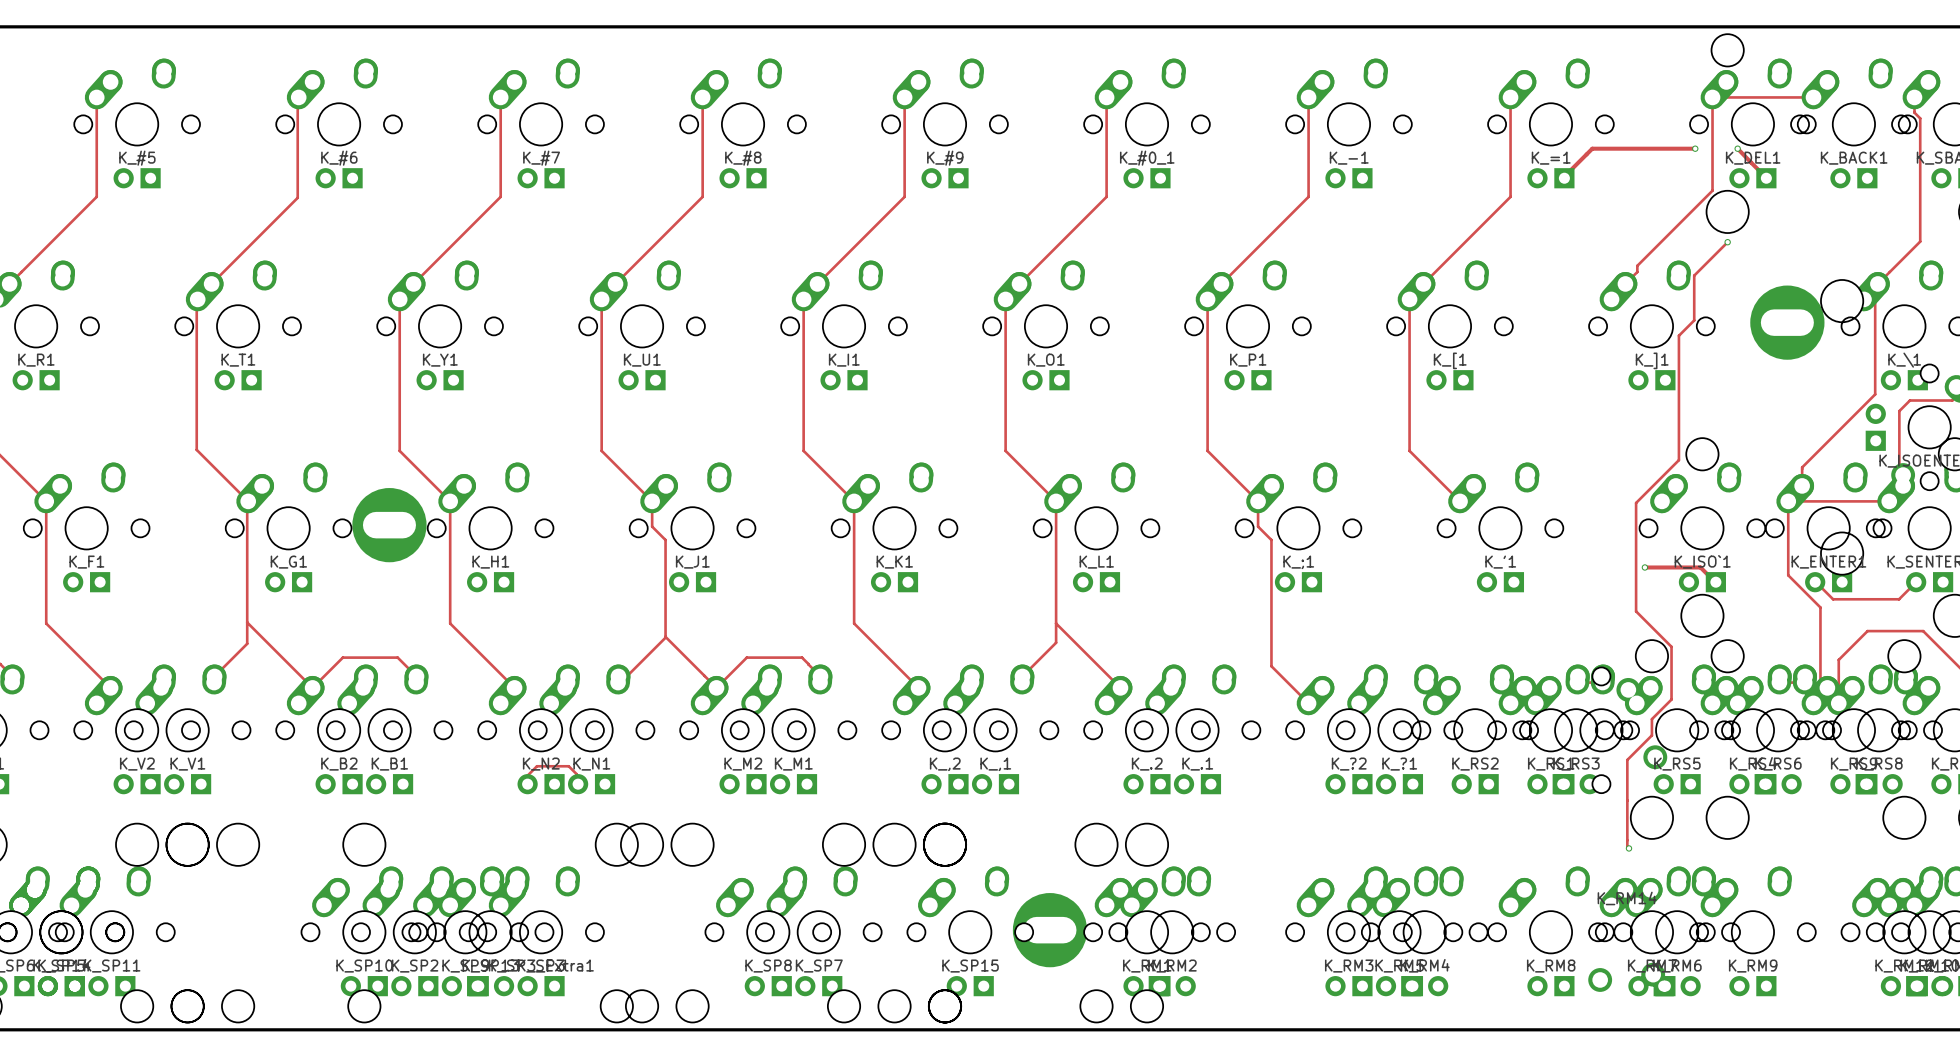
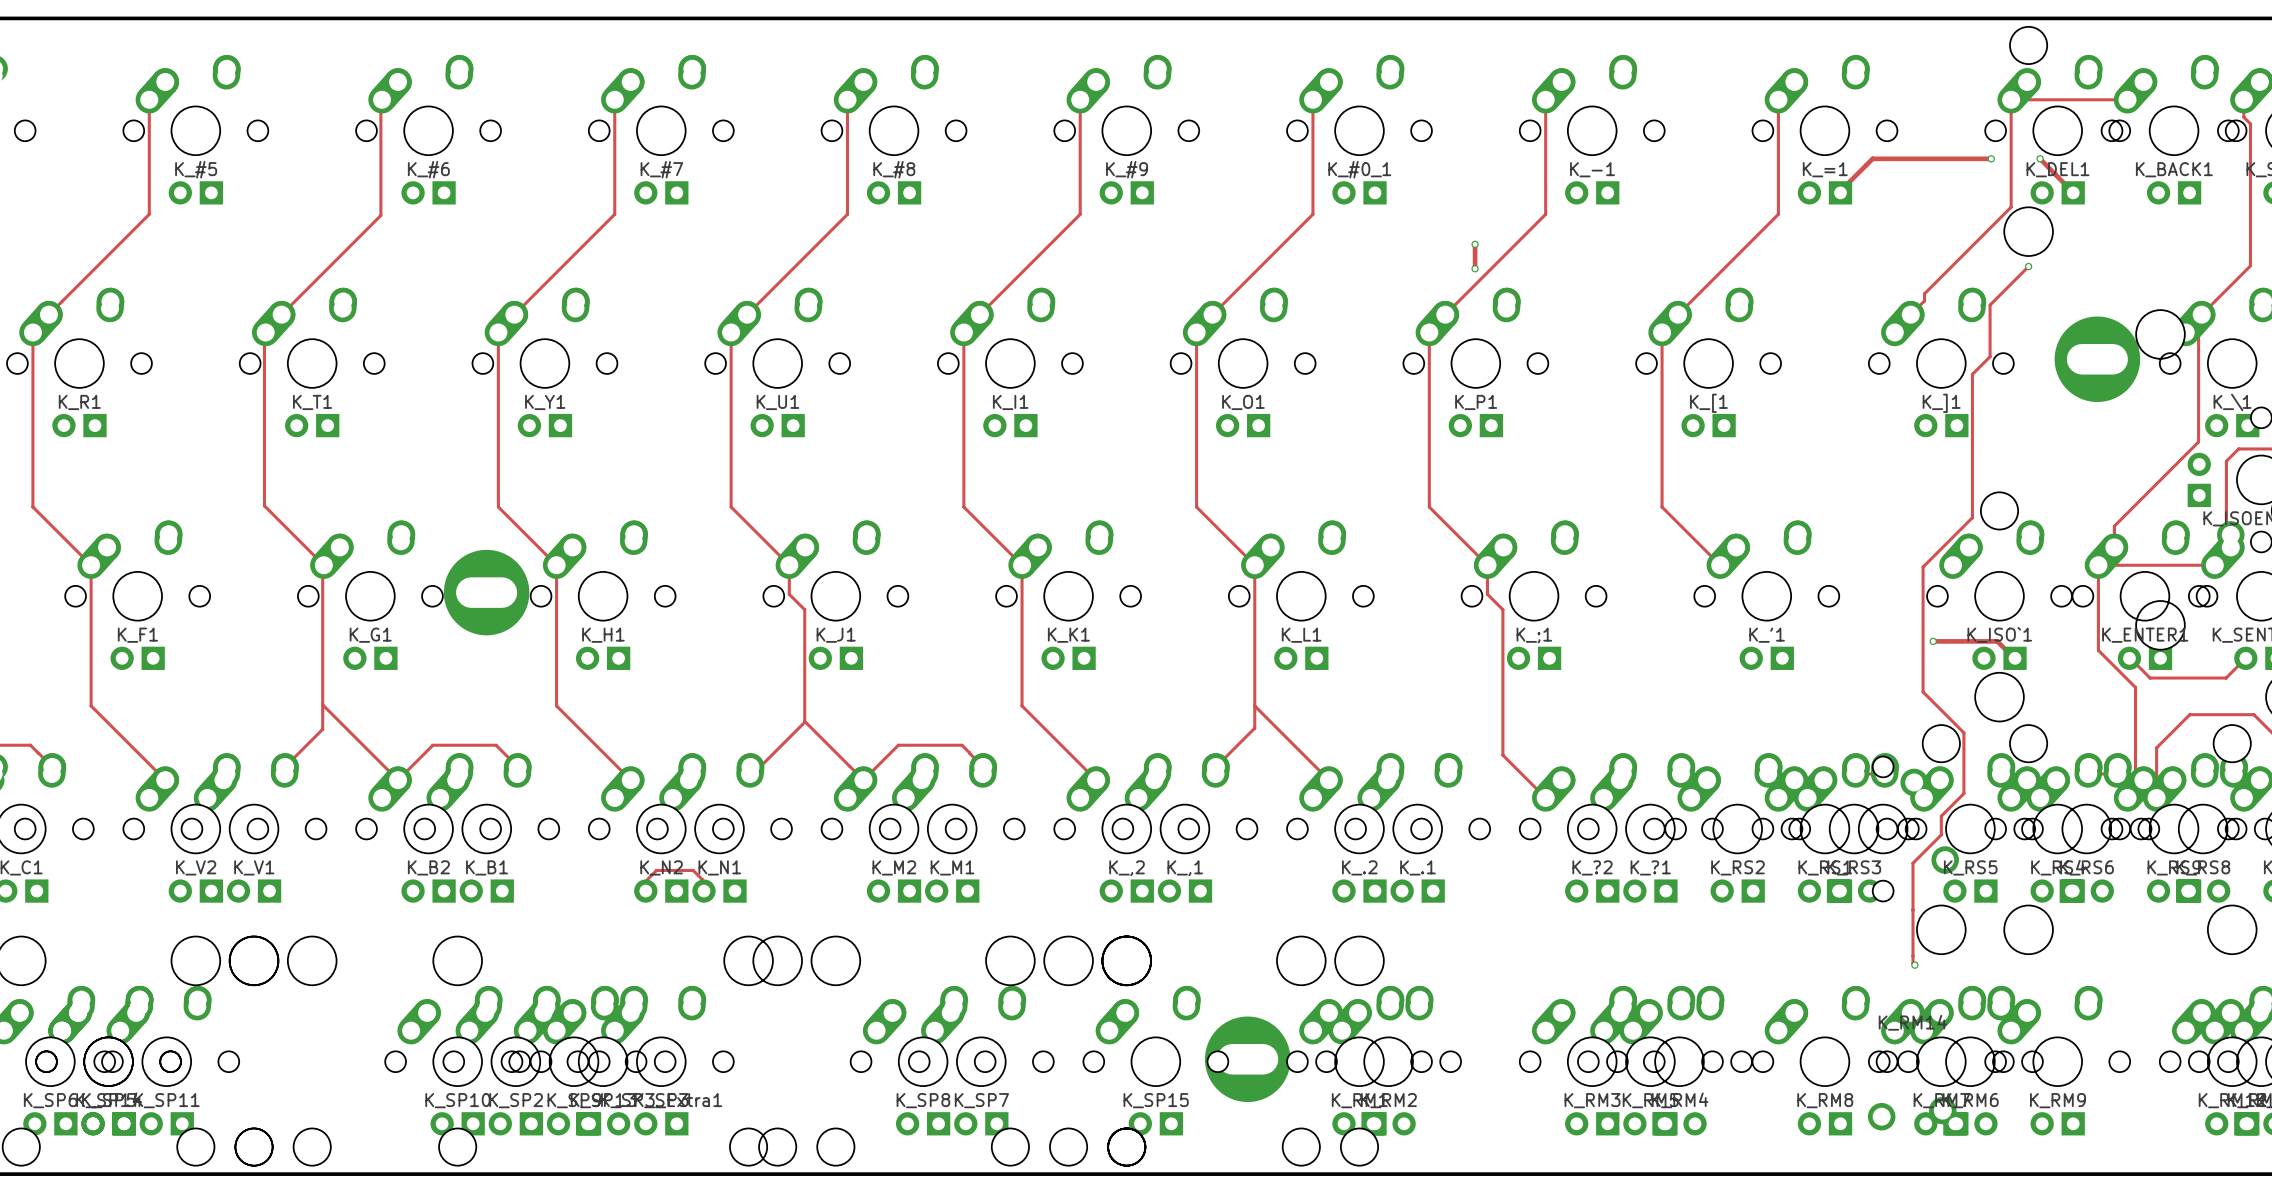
track: none -> (1475, 244) (1475, 268)
via: none -> (1475, 244)
via: none -> (1475, 268)

